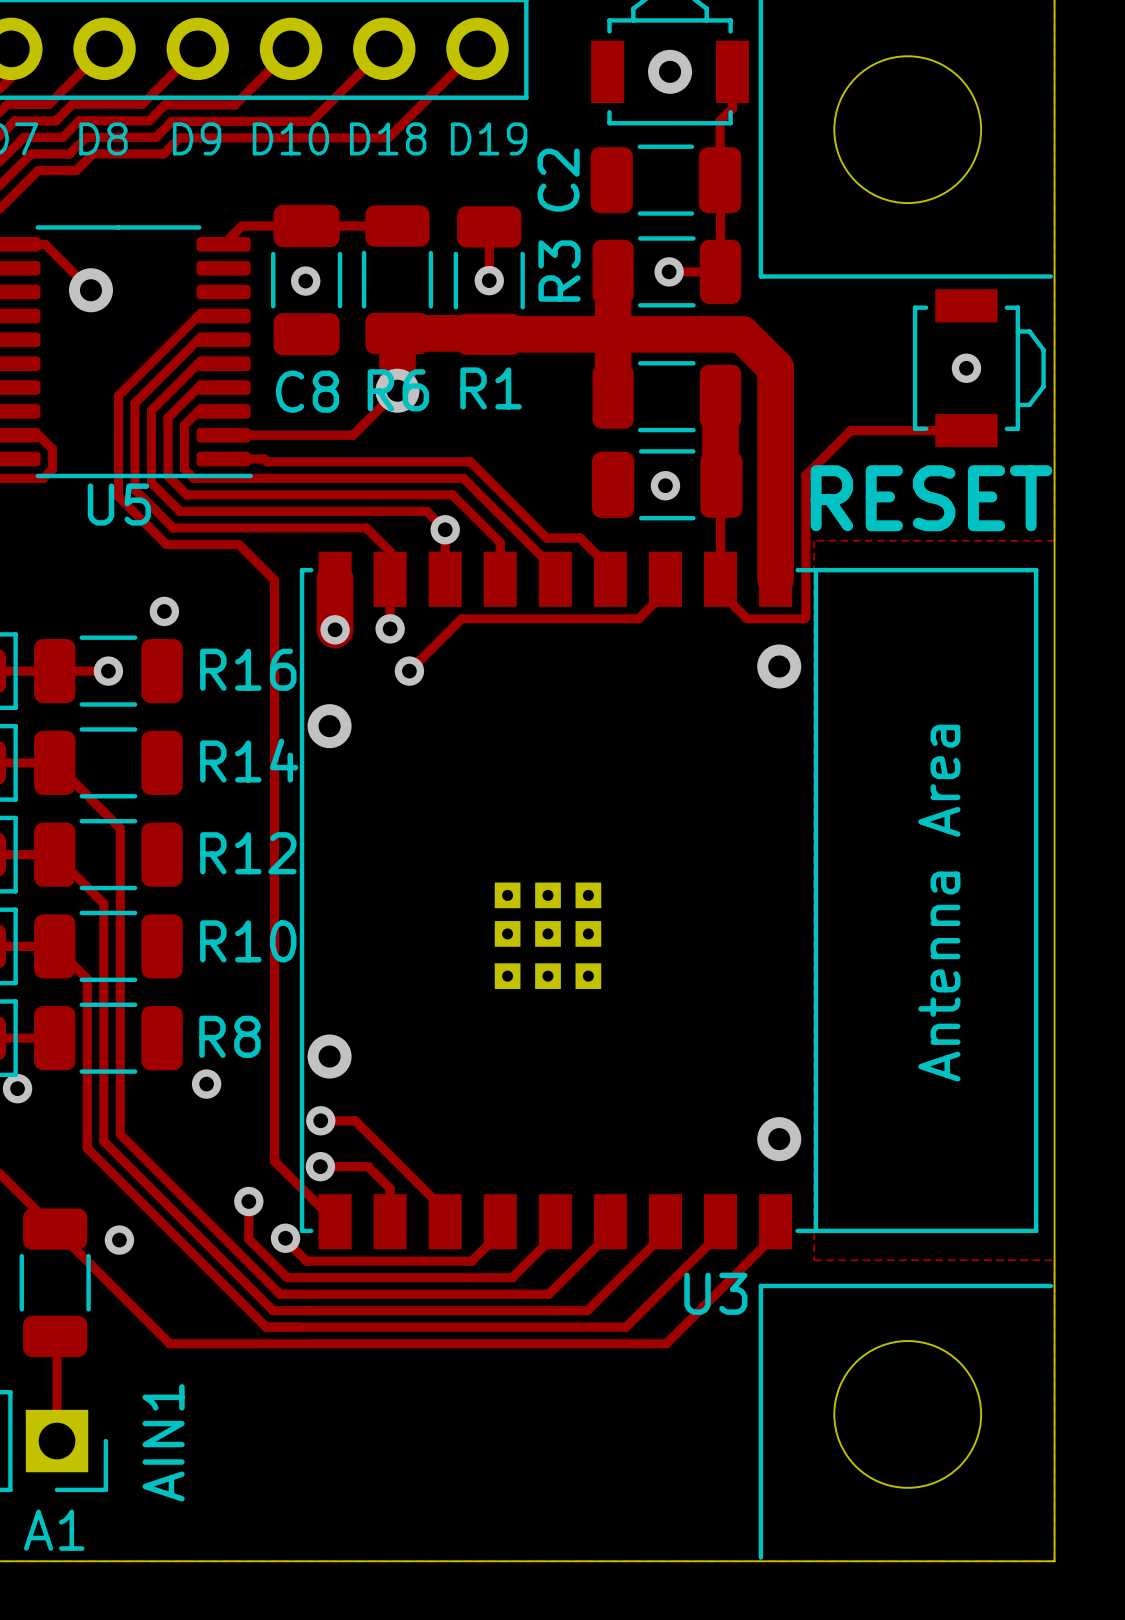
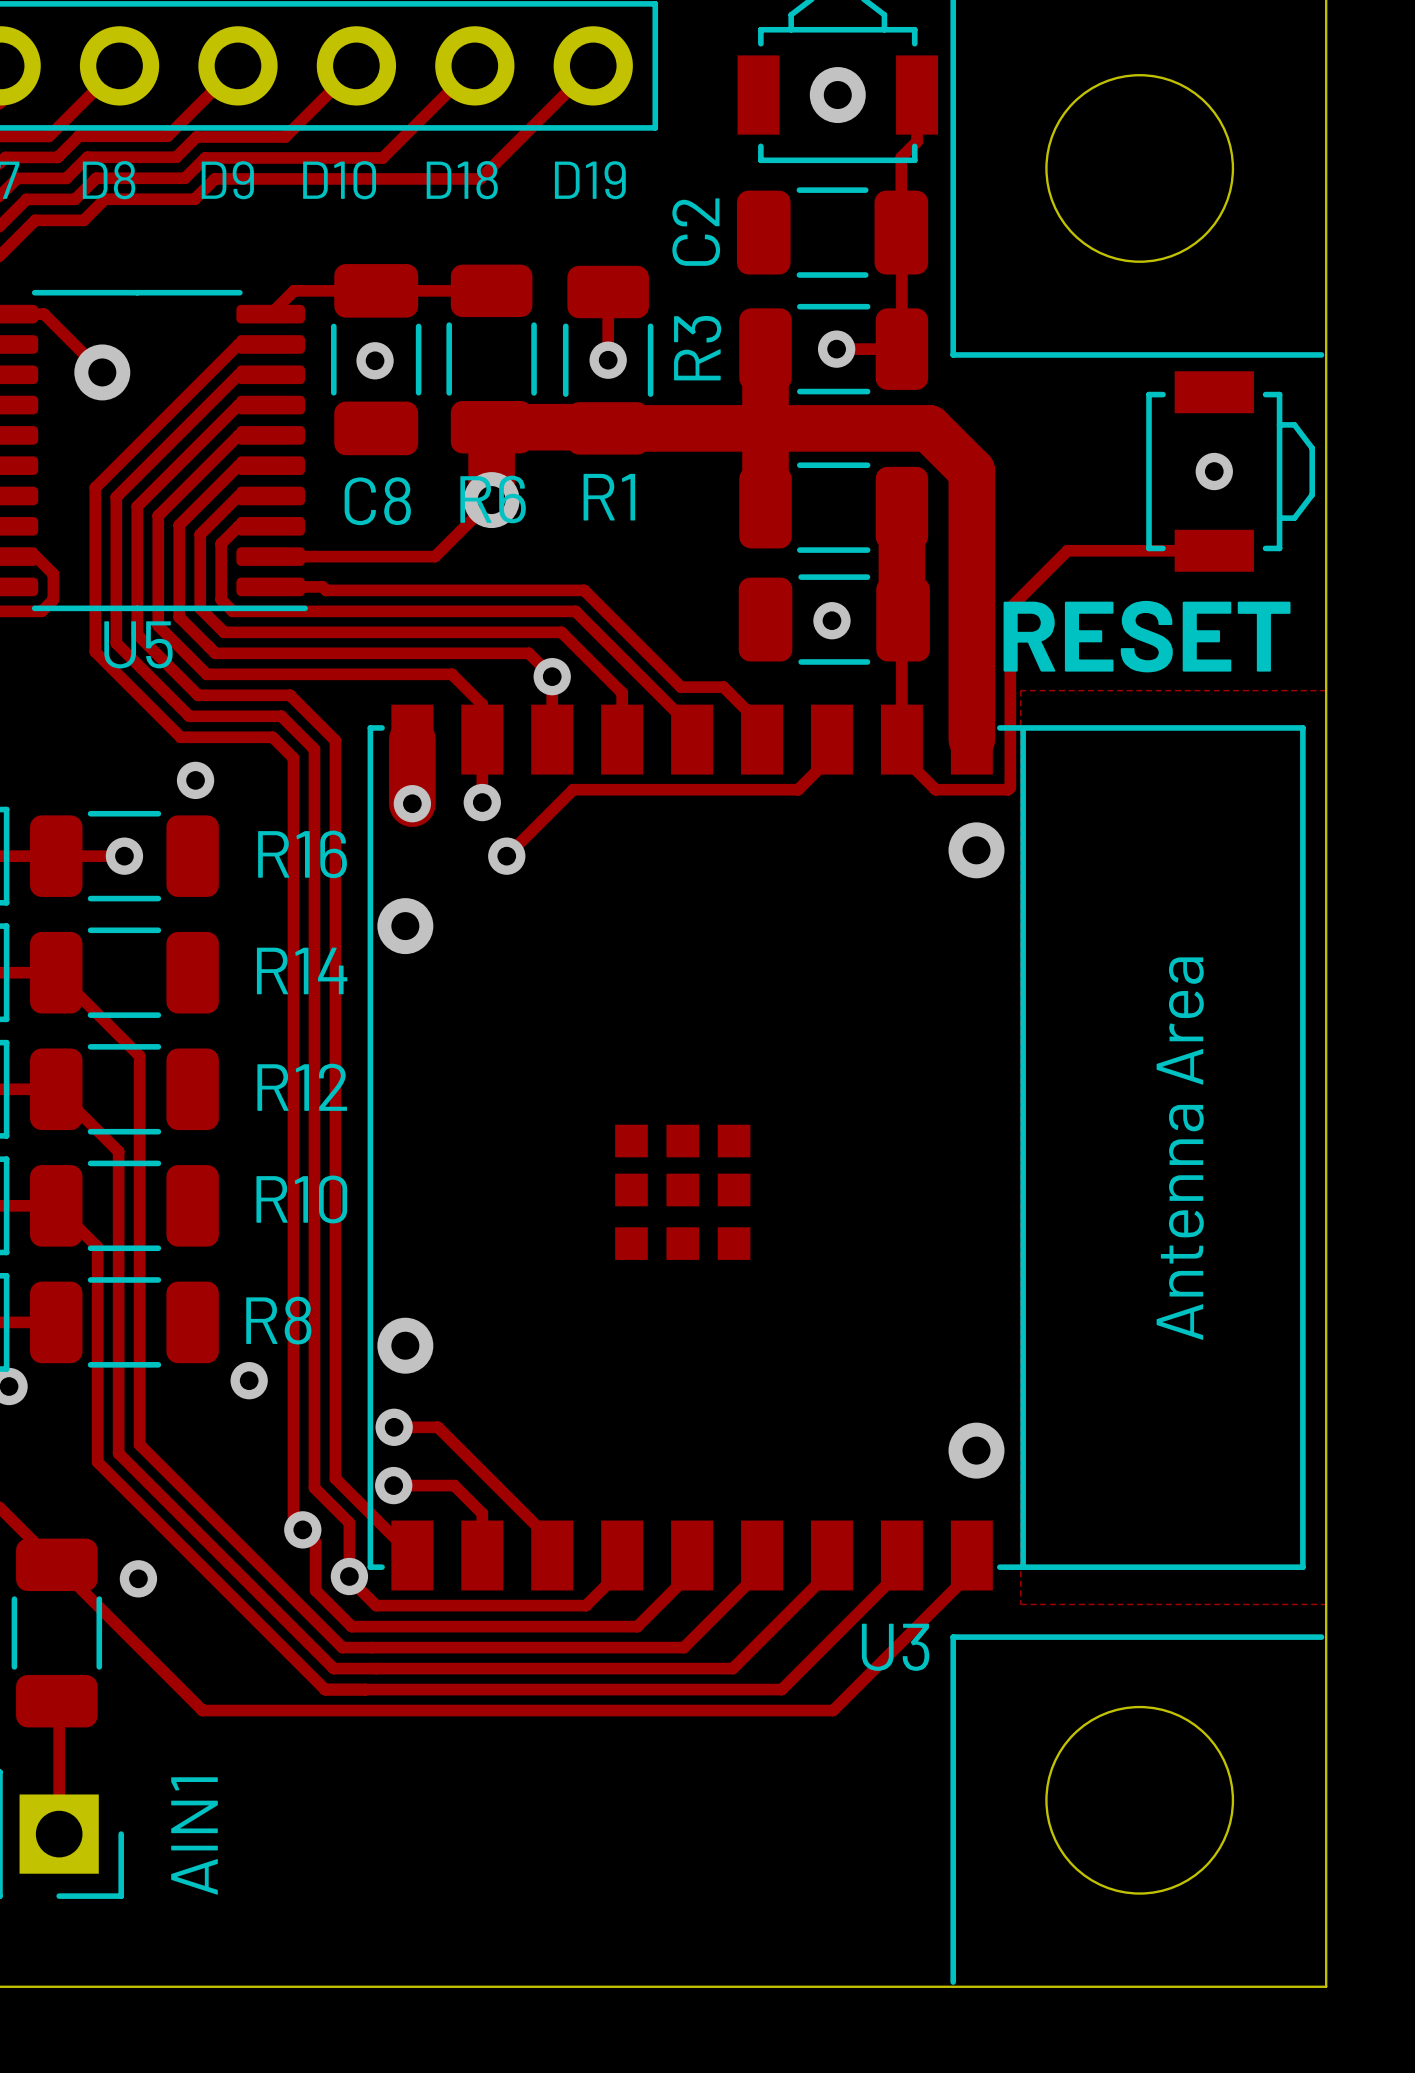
track: none -> (270, 374) (238, 374) (116, 497) (116, 643) (189, 716) (281, 716) (314, 749) (314, 1487) (349, 1522) (349, 1576)
U3 footprint: [299, 551, 1039, 1250] -> [367, 704, 1306, 1591]
track: (248, 1201) (248, 1239) (258, 1249) -> (270, 344) (238, 344) (95, 487) (95, 651) (180, 737) (272, 737) (293, 758) (293, 1520) (315, 1542) (315, 1590)

